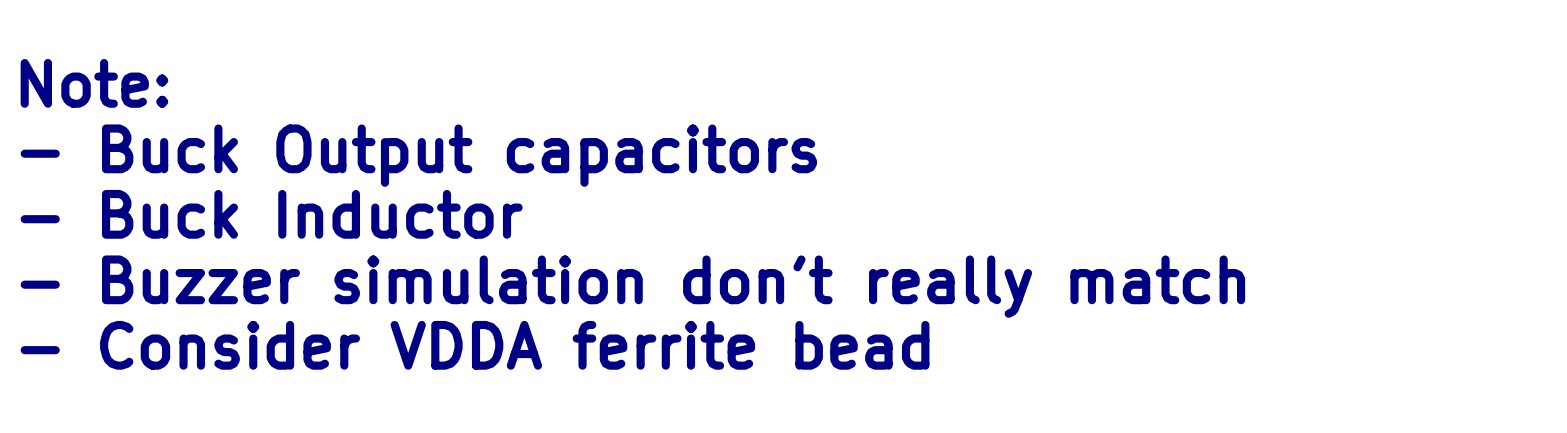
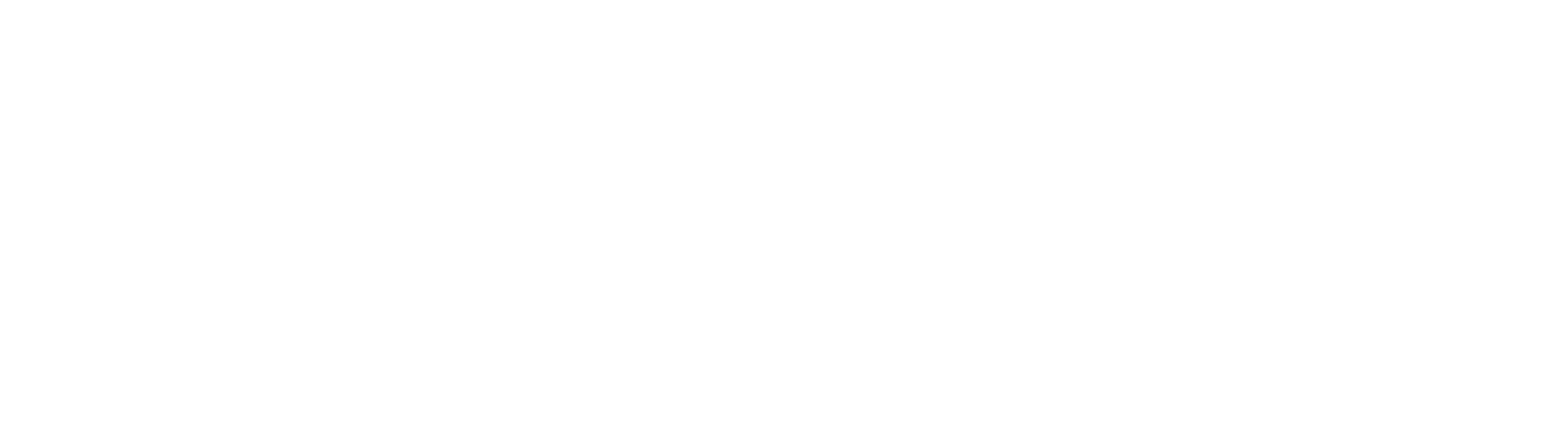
text: Note: (94, 83) -> none
text: - Buck Output capacitors (418, 155) -> none
text: - Buck Inductor (271, 214) -> none
text: - Buzzer simulation don't really match (632, 286) -> none
text: - Consider VDDA ferrite bead (475, 345) -> none

